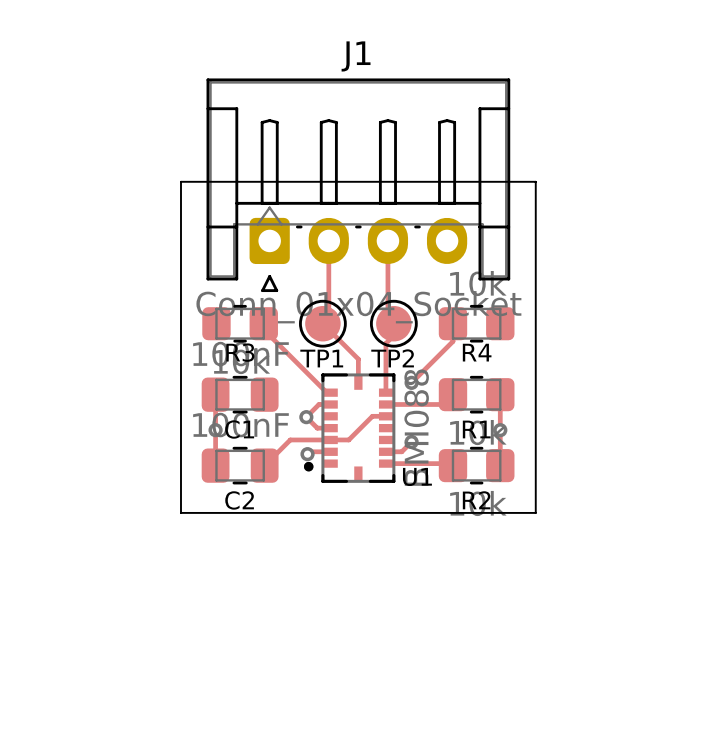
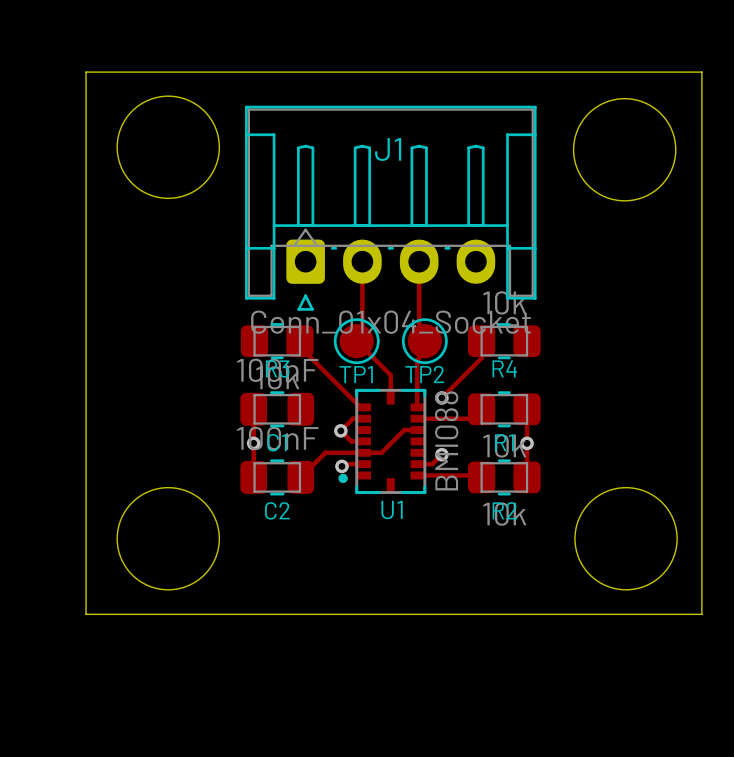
board edge: none -> (86, 72) (701, 72) (701, 614) (86, 614) (86, 72)
J1 name position: J1 (356, 56) -> J1 (388, 149)
round board edge: none -> [116, 95, 220, 199]
round board edge: none -> [573, 98, 677, 202]
board edge: (180, 181) (535, 181) (535, 512) (180, 512) (180, 181) -> none
round board edge: none -> [116, 487, 220, 591]
round board edge: none -> [574, 487, 678, 591]
U1 name position: U1 (417, 476) -> U1 (392, 510)

